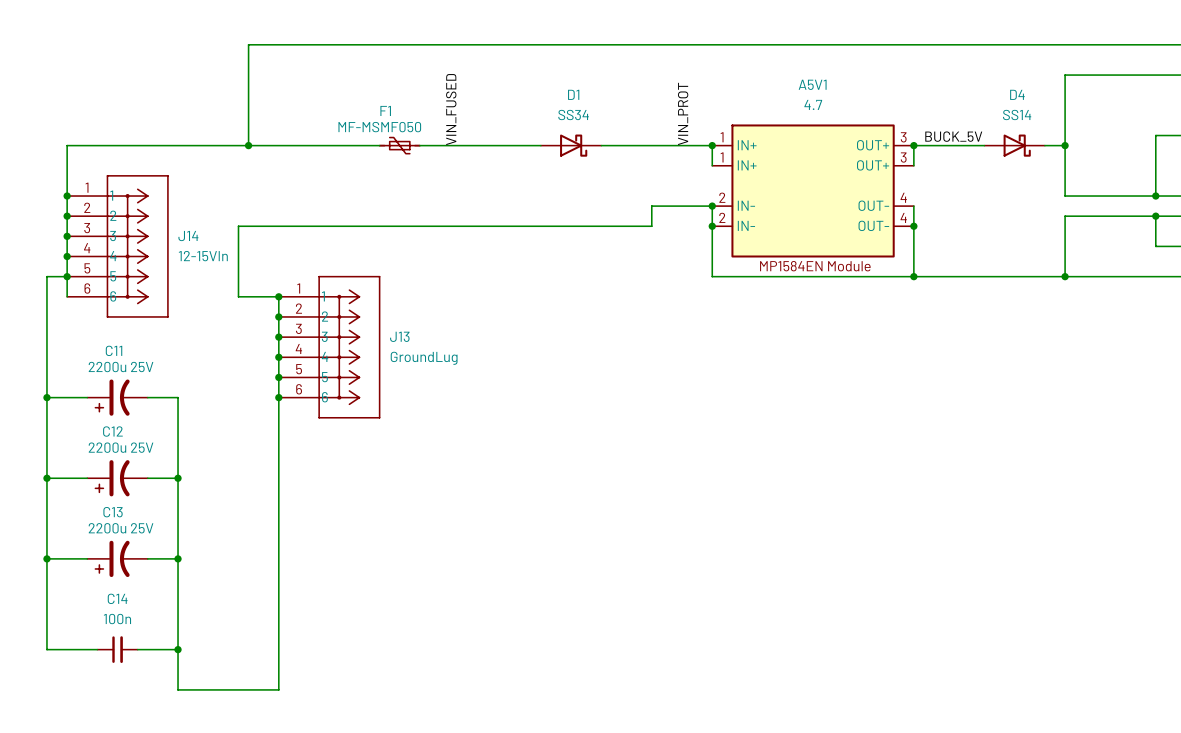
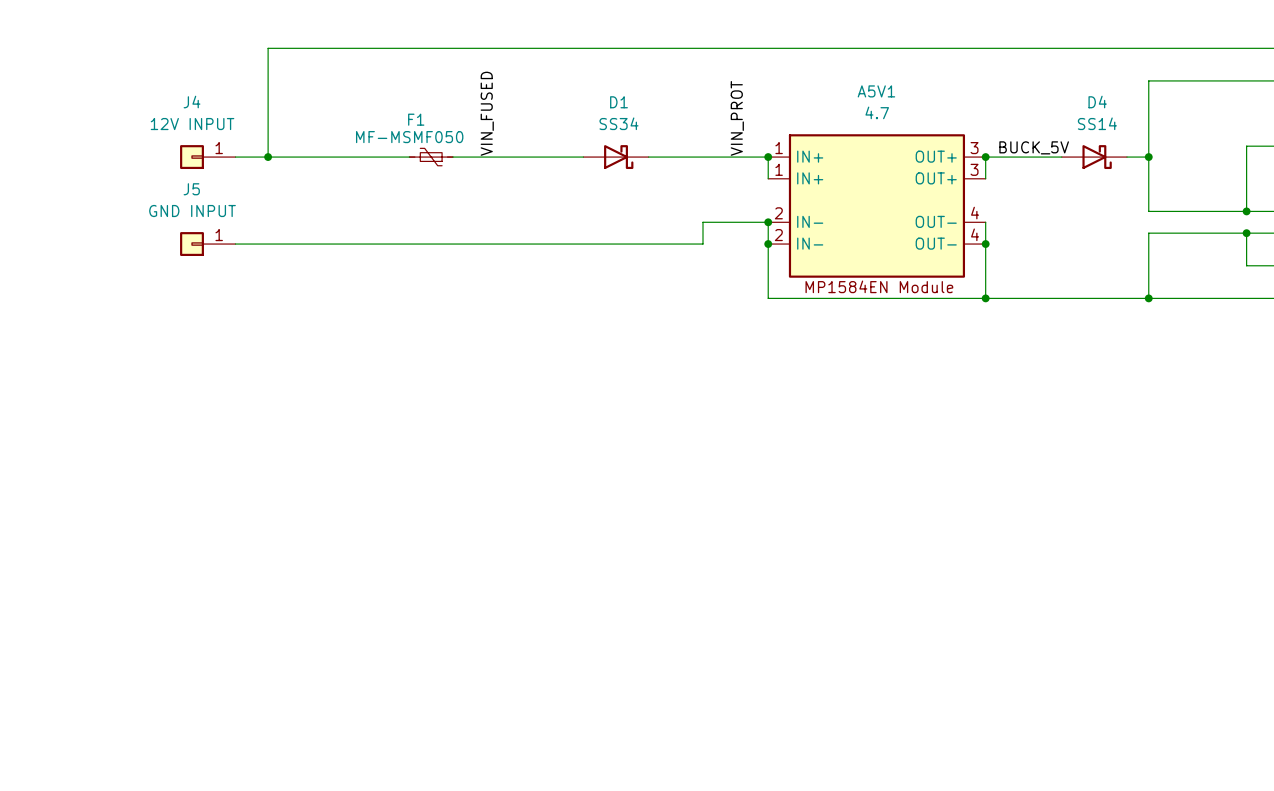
J4: none -> 12V INPUT (207, 157)
wire: (218, 145) (67, 145) (67, 296) -> none
junction: (67, 196) -> none
junction: (67, 216) -> none
J5: none -> GND INPUT (207, 244)
wire: (238, 226) (238, 296) (278, 296) (278, 689) (178, 689) (178, 397) (147, 397) -> (257, 244) (235, 244)
junction: (67, 236) -> none
J14: 12-15VIn (117, 246) -> none
junction: (67, 256) -> none
wire: (67, 276) (46, 276) (46, 649) (97, 649) -> none
junction: (67, 276) -> none
junction: (278, 296) -> none
junction: (278, 316) -> none
junction: (278, 337) -> none
J13: GroundLug (329, 347) -> none
junction: (278, 357) -> none
junction: (278, 377) -> none
wire: (46, 397) (87, 397) -> none
junction: (46, 397) -> none
C11: 2200u 25V (117, 397) -> none
junction: (278, 397) -> none
wire: (46, 478) (87, 478) -> none
junction: (46, 478) -> none
C12: 2200u 25V (117, 478) -> none
wire: (147, 478) (178, 478) -> none
junction: (178, 478) -> none
wire: (46, 558) (87, 558) -> none
junction: (46, 558) -> none
C13: 2200u 25V (117, 558) -> none
wire: (147, 558) (178, 558) -> none
junction: (178, 558) -> none
C14: 100n (117, 649) -> none
wire: (137, 649) (178, 649) -> none
junction: (178, 649) -> none

